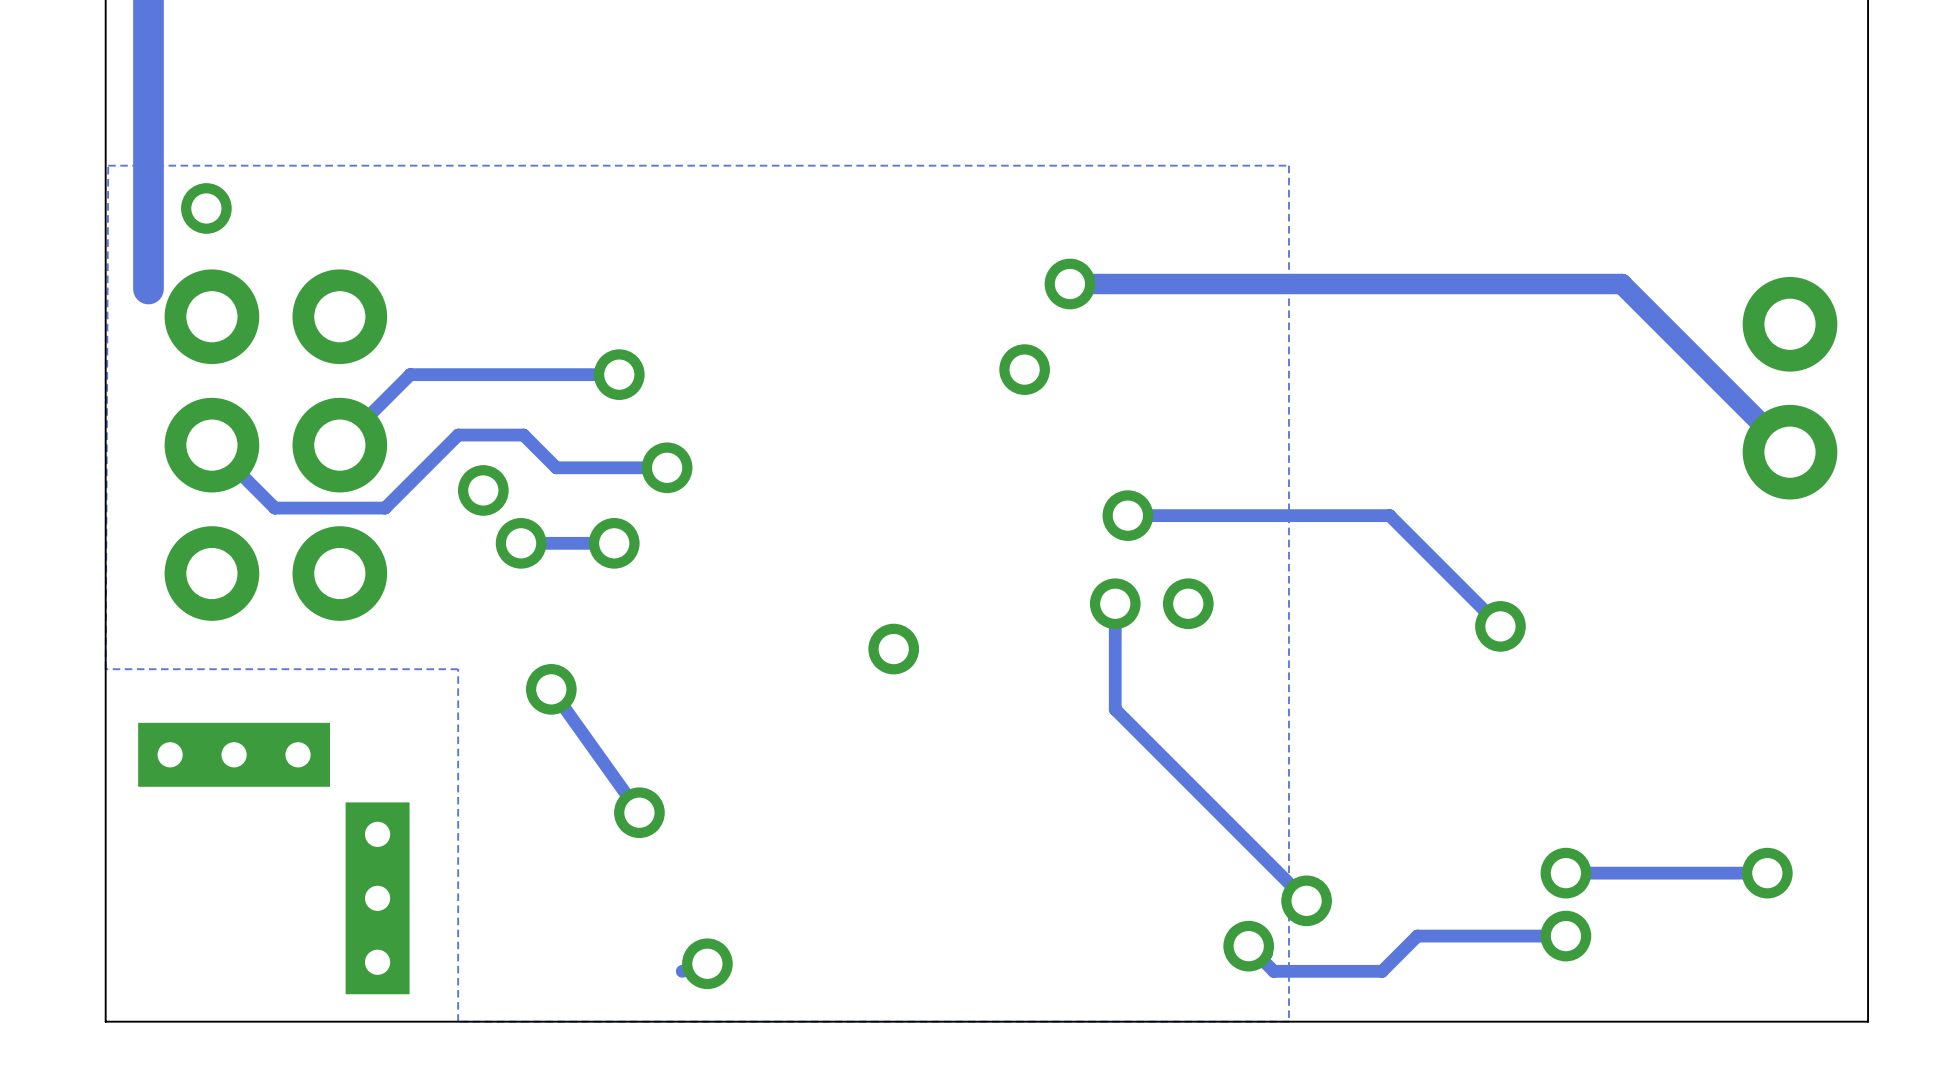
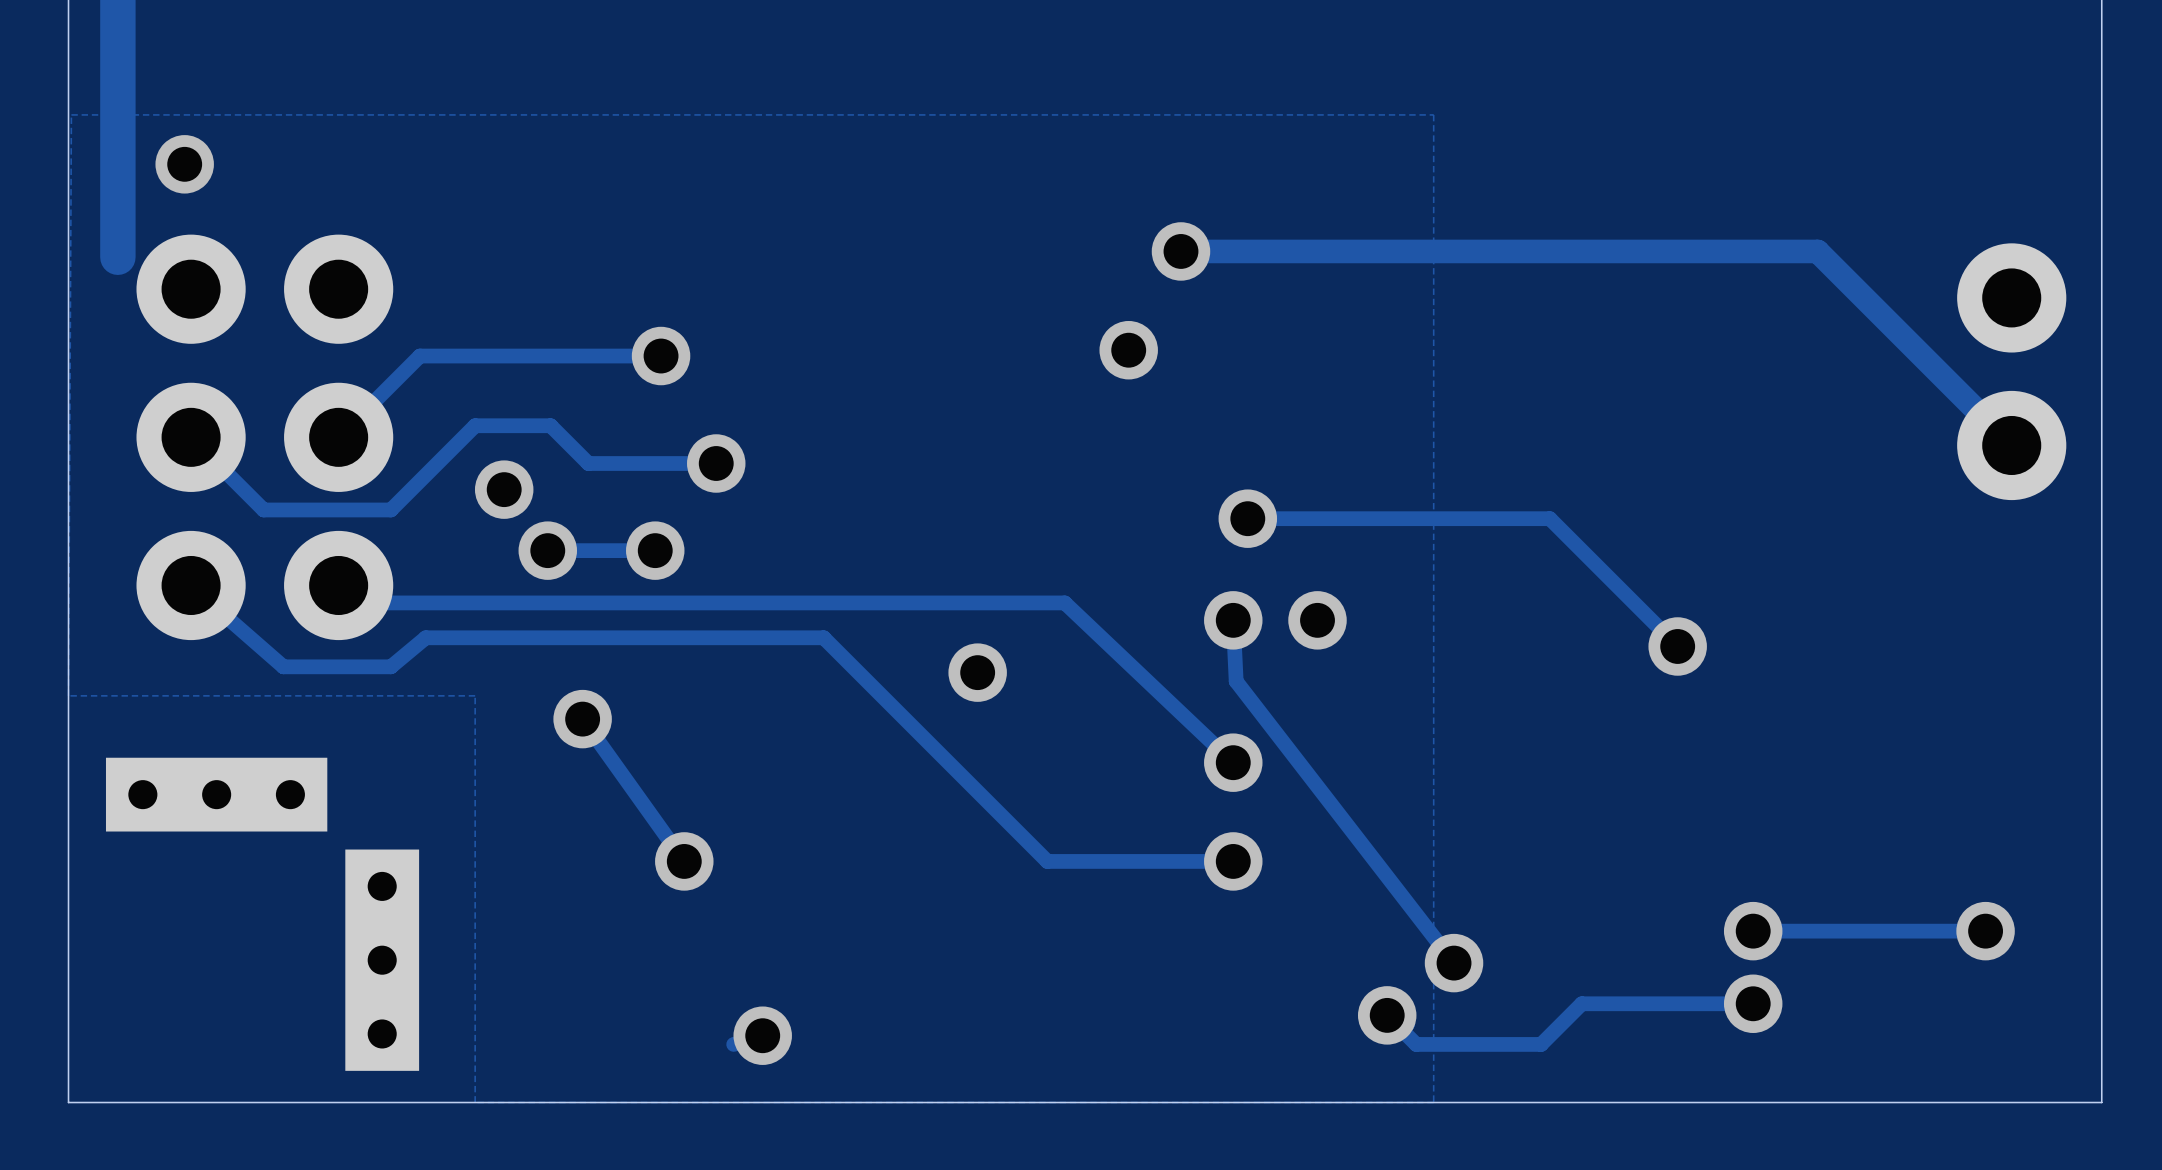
track: none -> (338, 585) (356, 602) (1064, 602) (1233, 762)
track: none -> (191, 586) (283, 666) (390, 666) (425, 637) (823, 637) (1047, 861) (1233, 861)
track: (1115, 603) (1115, 709) (1306, 900) -> (1233, 620) (1236, 681) (1454, 963)
via: none -> (1233, 762)
via: none -> (1233, 861)

